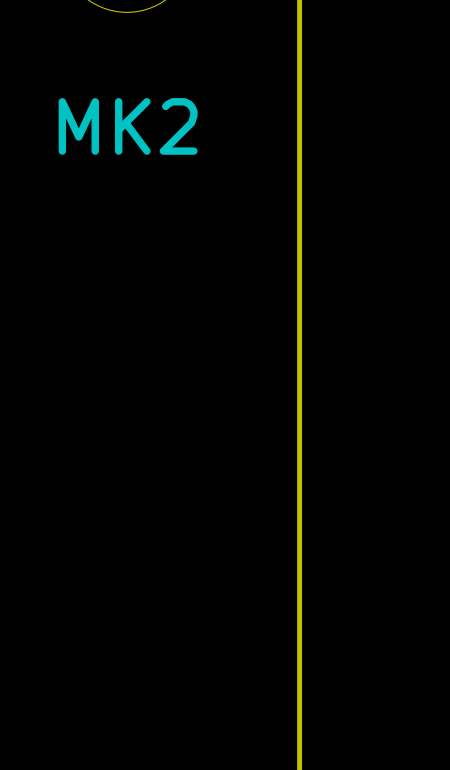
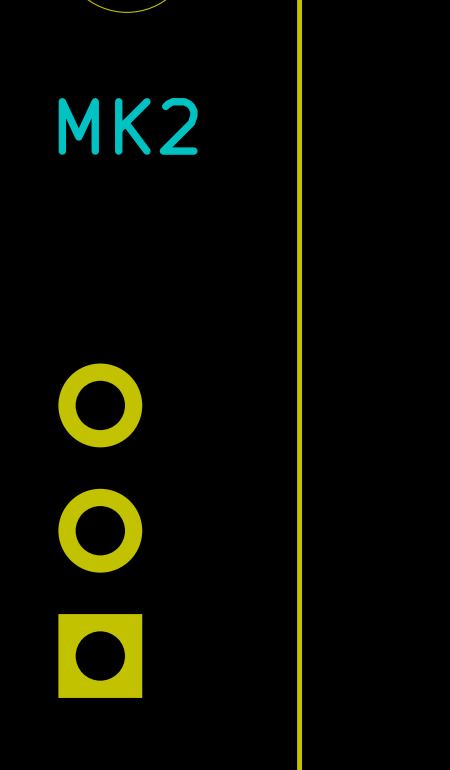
part: none -> (100, 530)

